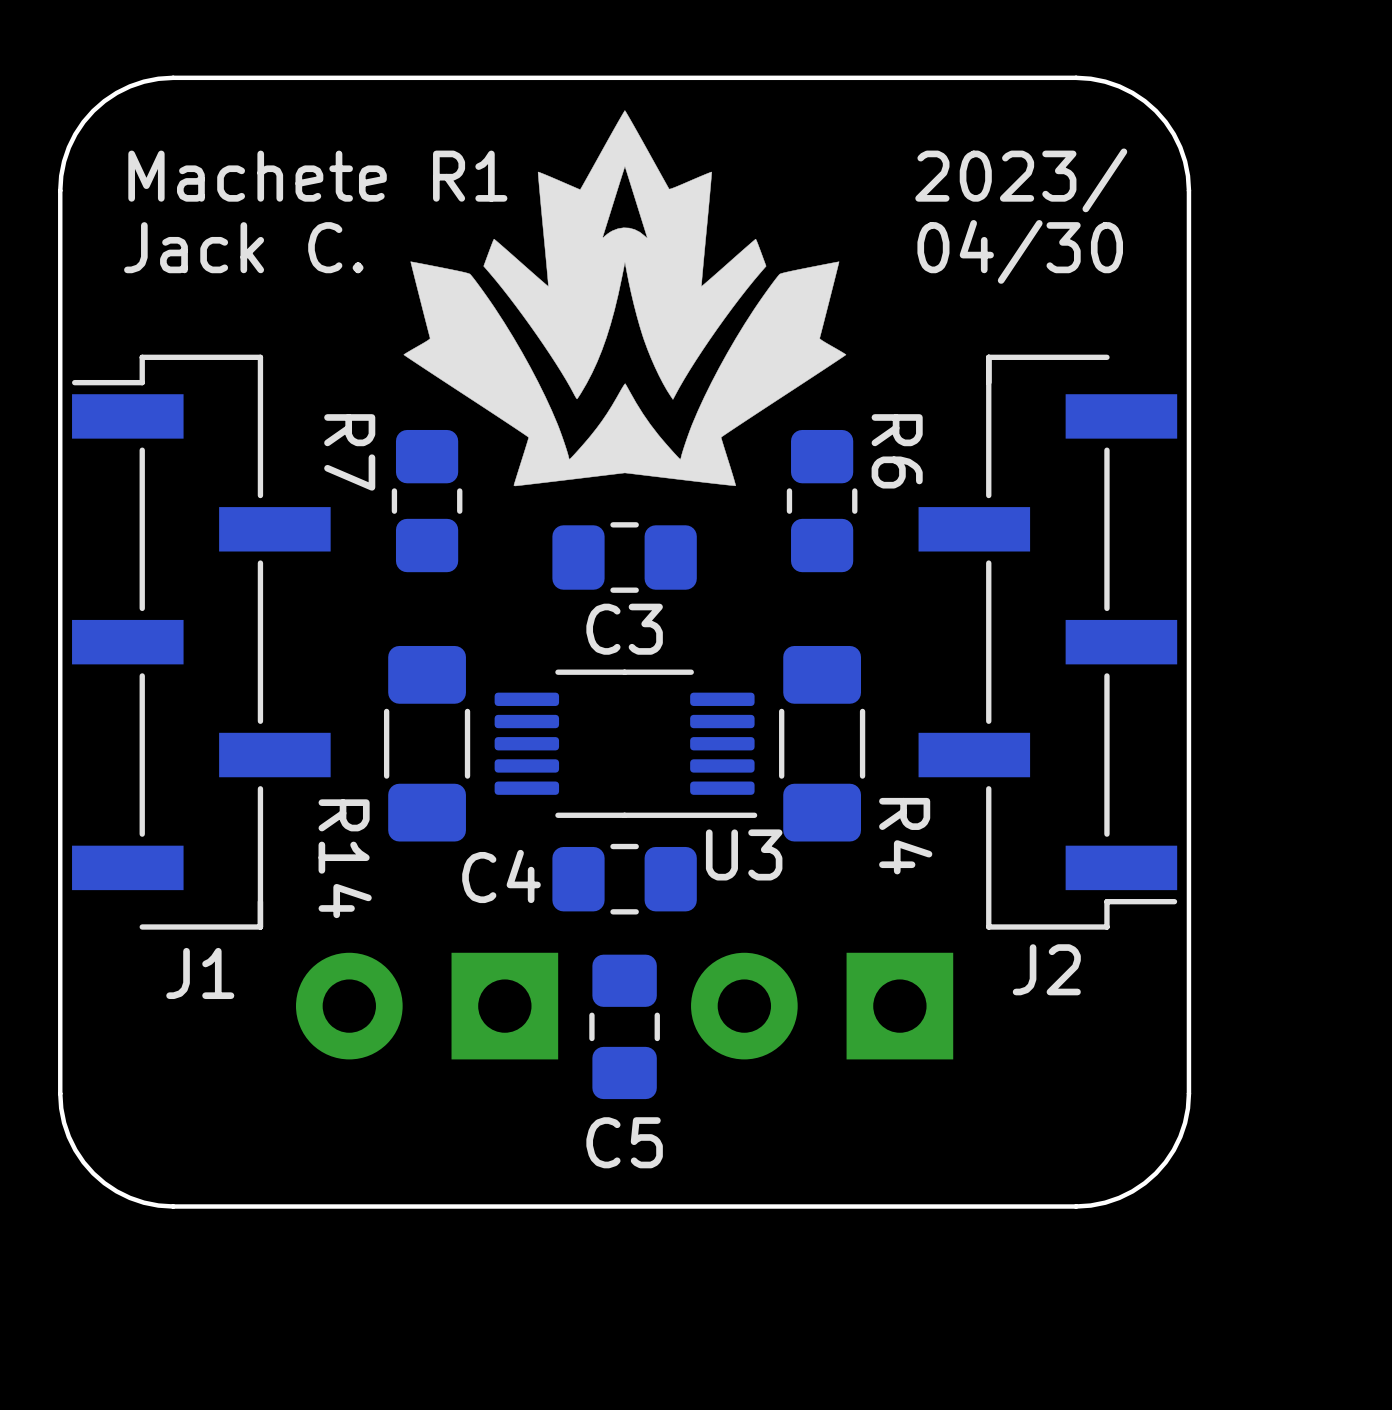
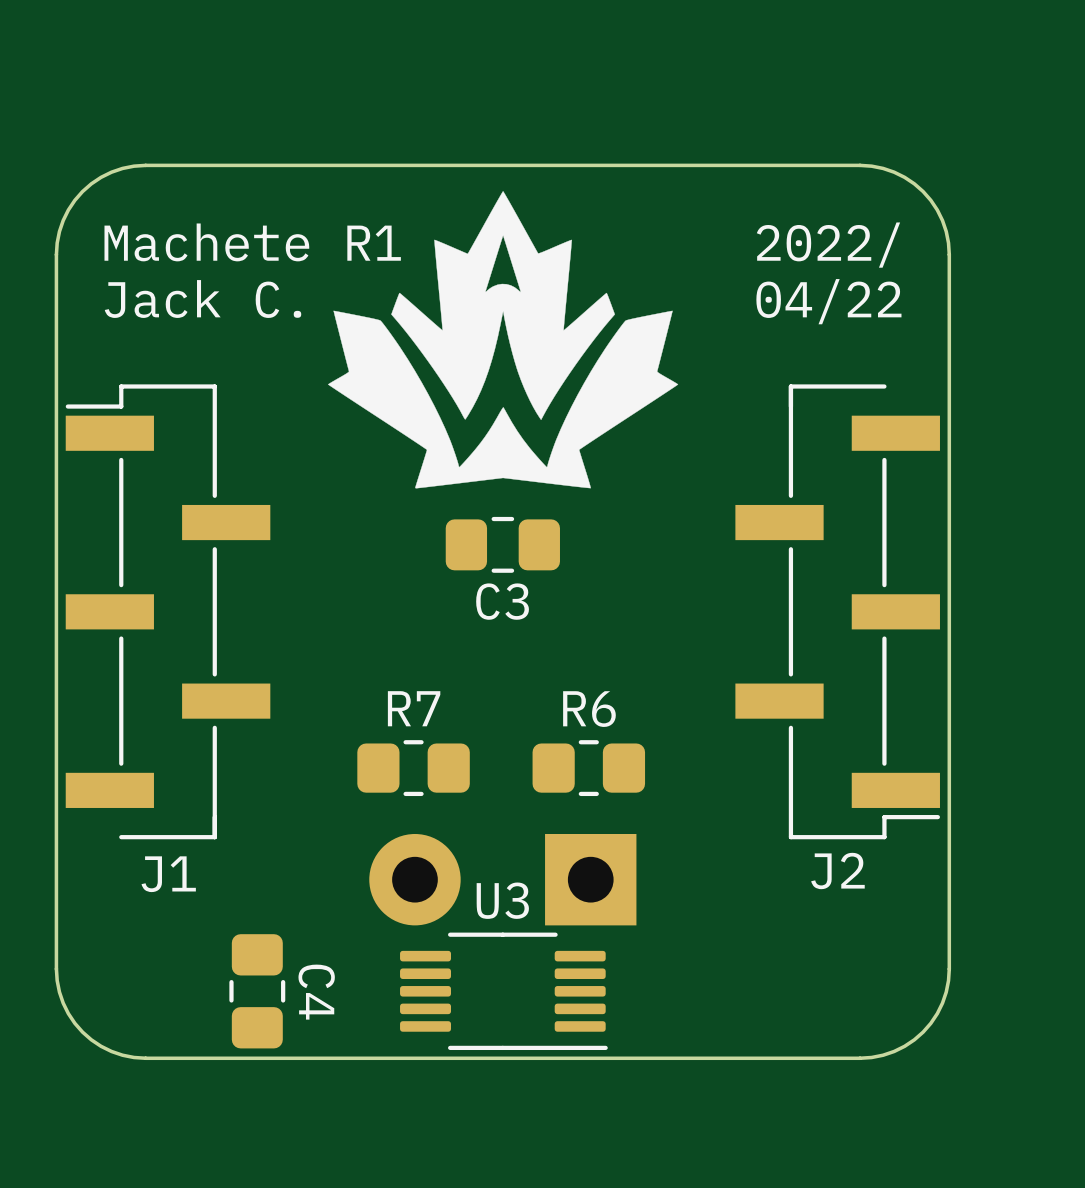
text: 2023/ (1021, 180) -> 2022/ (828, 245)
text: 04/30 (1020, 251) -> 04/22 (828, 301)
R7 rotation: 0° (427, 501) -> 90° clockwise (413, 768)
R7 position: (427, 501) -> (413, 768)
R6 rotation: 0° (822, 501) -> 90° clockwise (588, 768)
R6 position: (822, 501) -> (588, 768)
R14: (427, 743) -> none
U3 position: (625, 743) -> (503, 991)
R4: (822, 743) -> none
U3 name position: U3 (744, 854) -> U3 (502, 900)
C4 name position: C4 (501, 876) -> C4 (316, 992)
C4 rotation: 0° (624, 879) -> 90° clockwise (257, 991)
C4 position: (624, 879) -> (257, 991)
part: none -> (502, 879)
part: (427, 1006) -> none
part: (822, 1006) -> none
C5: (624, 1026) -> none

